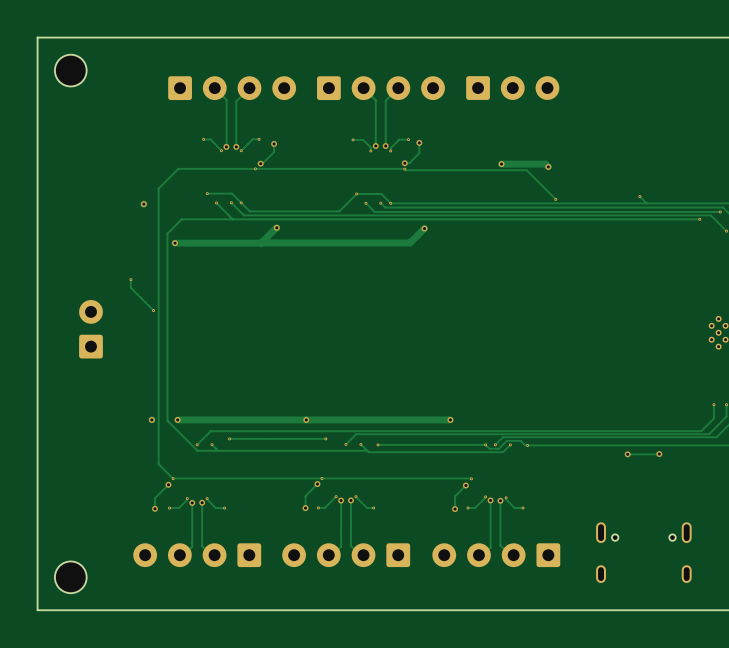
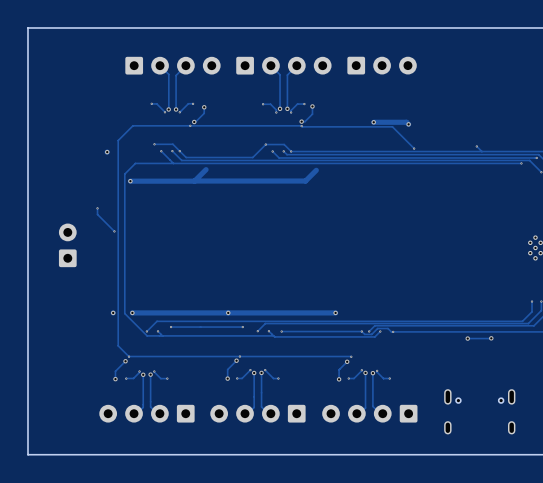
part: (70, 70) -> none
via: (276, 227) -> none
via: (424, 228) -> none
part: (70, 577) -> none

